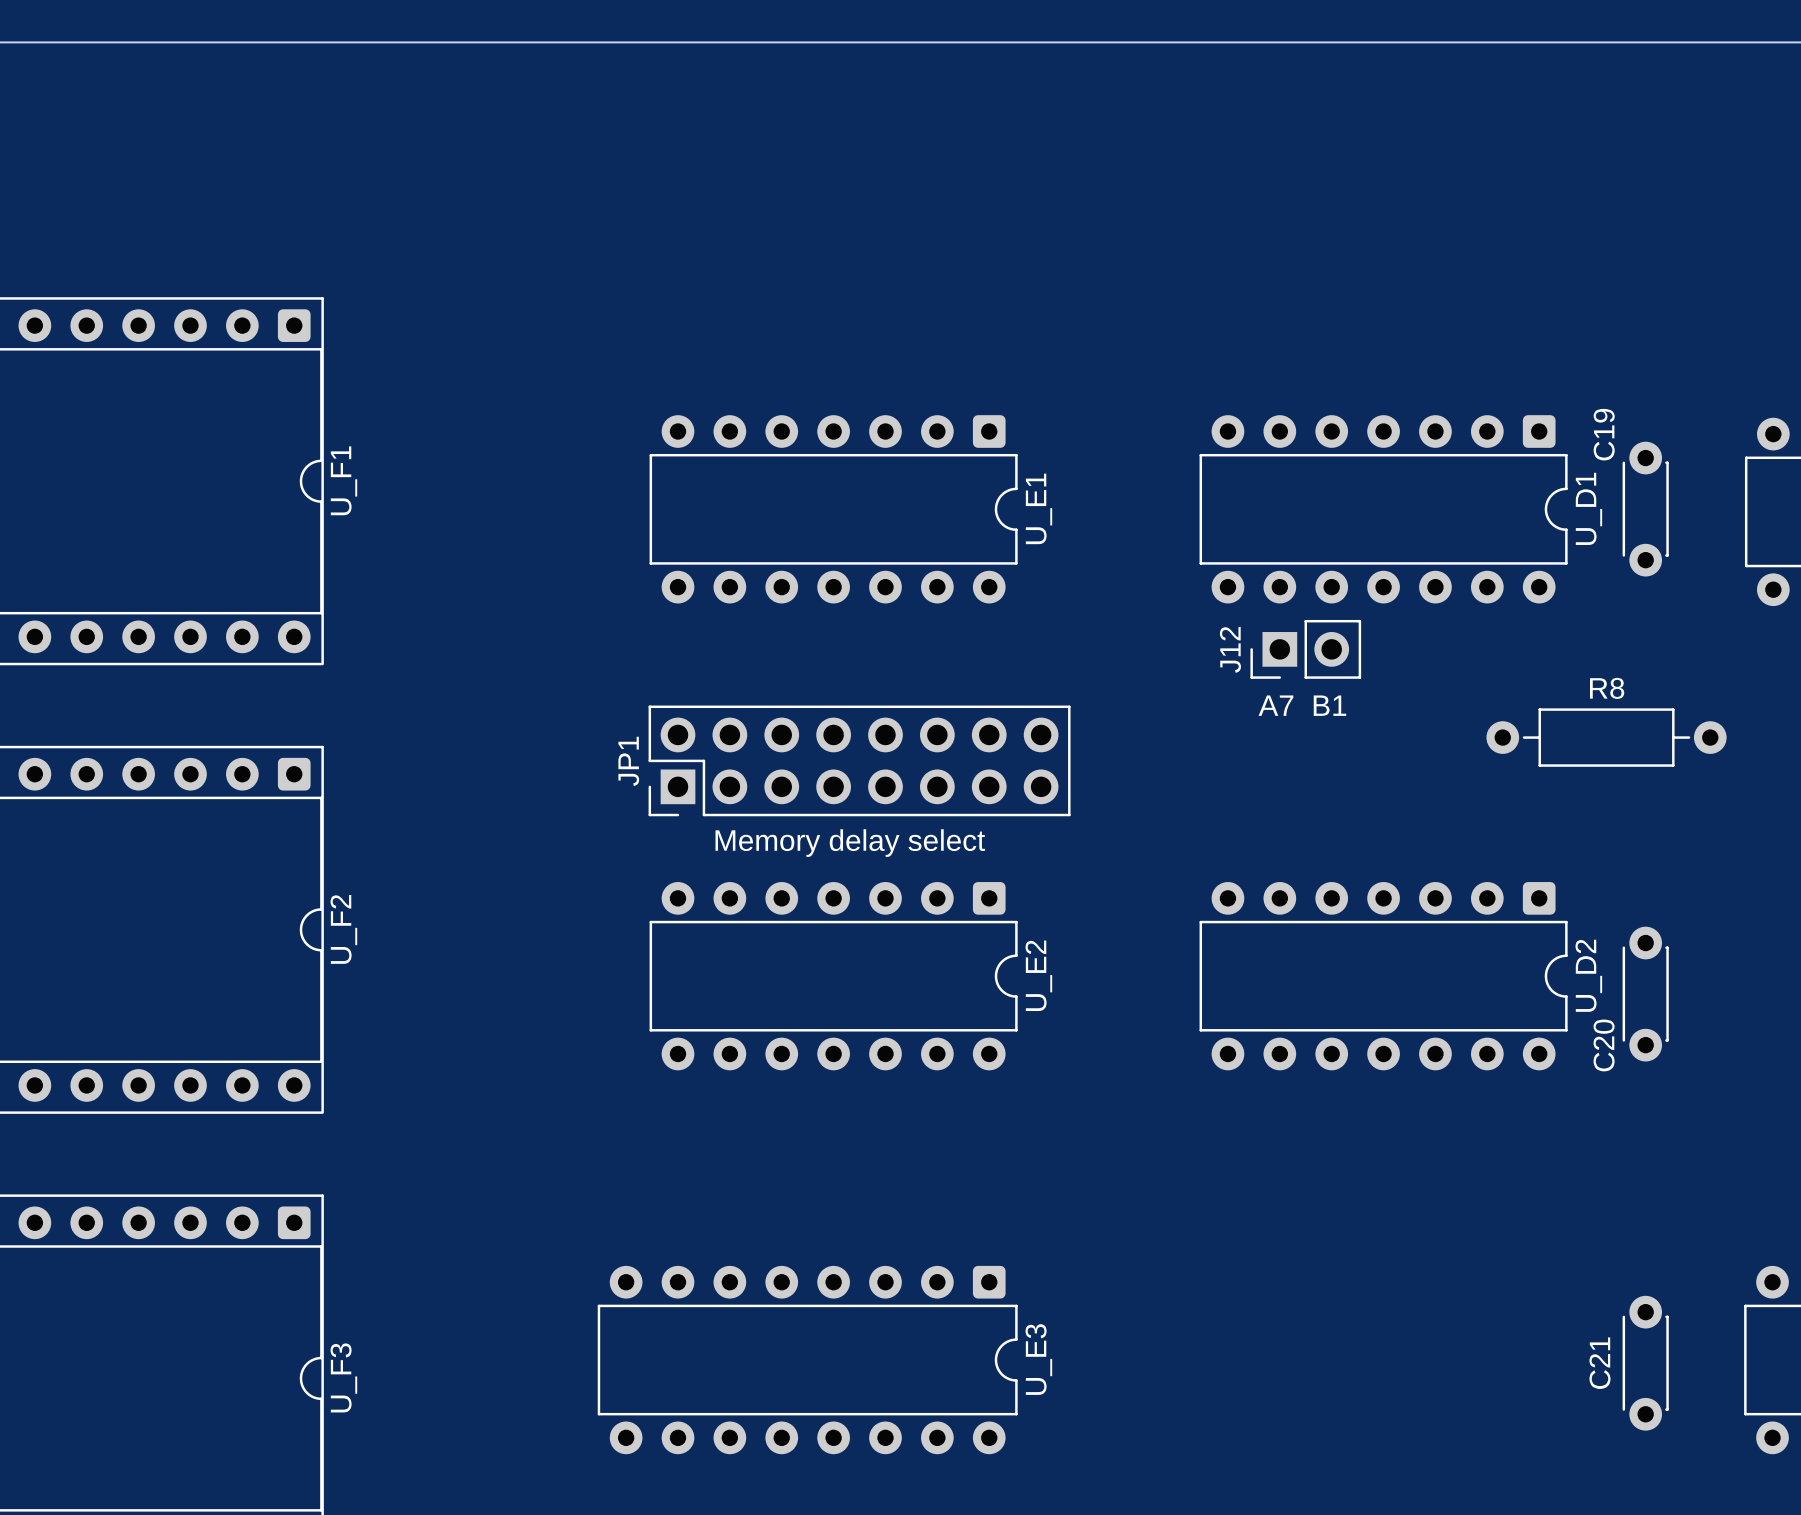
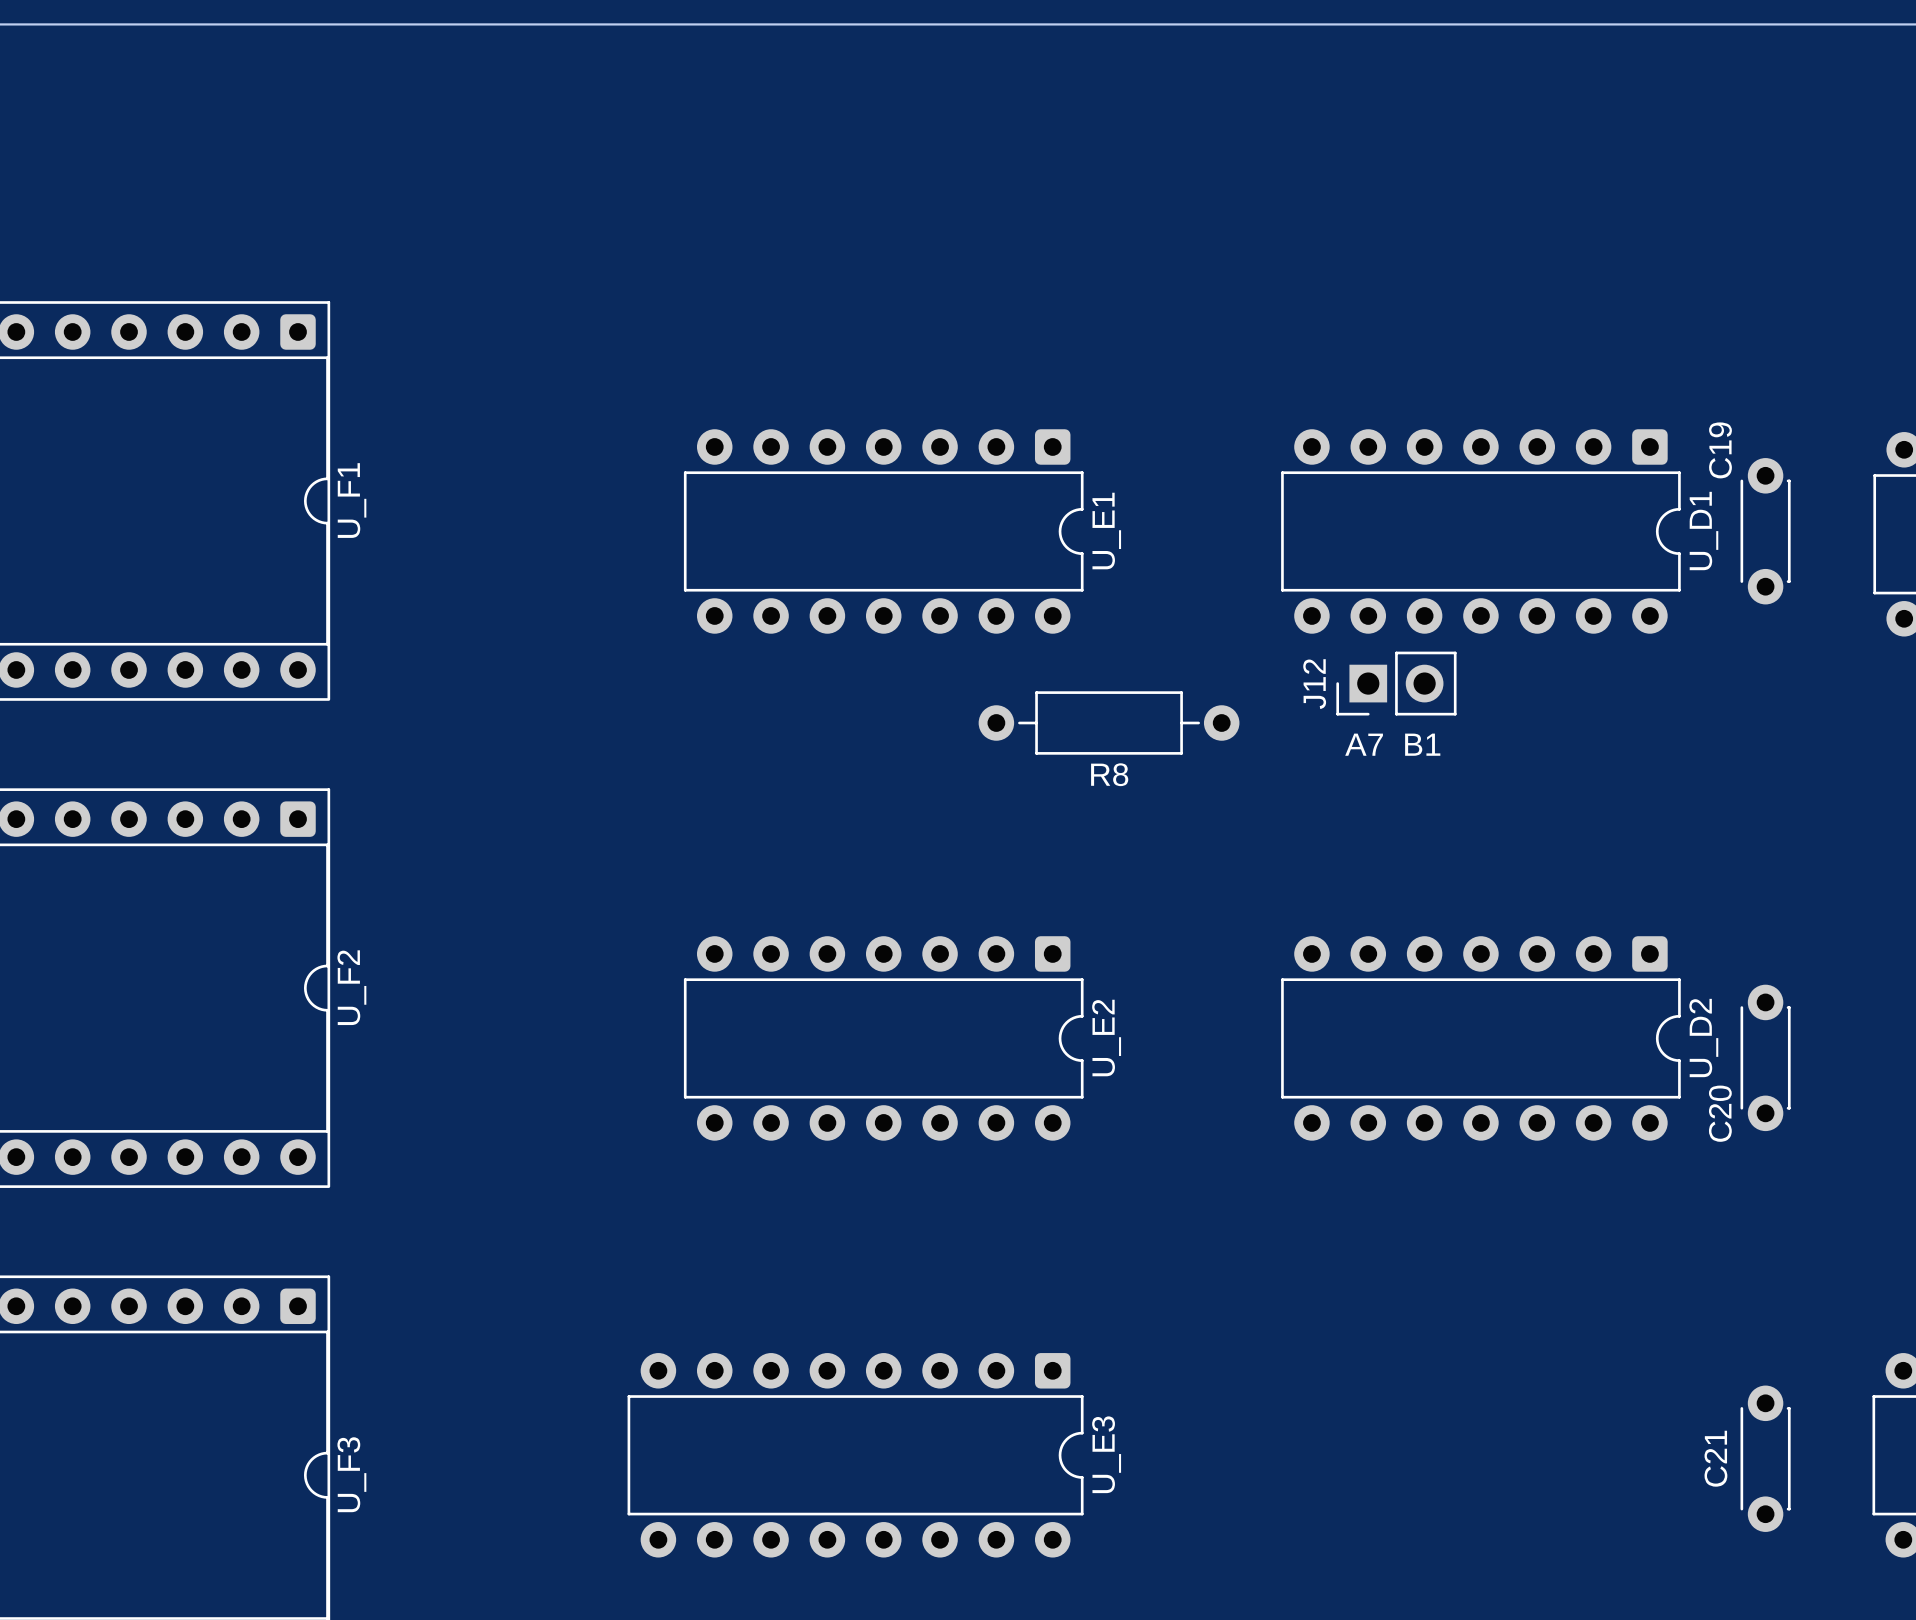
R8 name position: R8 (1607, 688) -> R8 (1109, 774)
R8 position: (1606, 737) -> (1109, 722)
JP1: Memory delay select (859, 760) -> none

